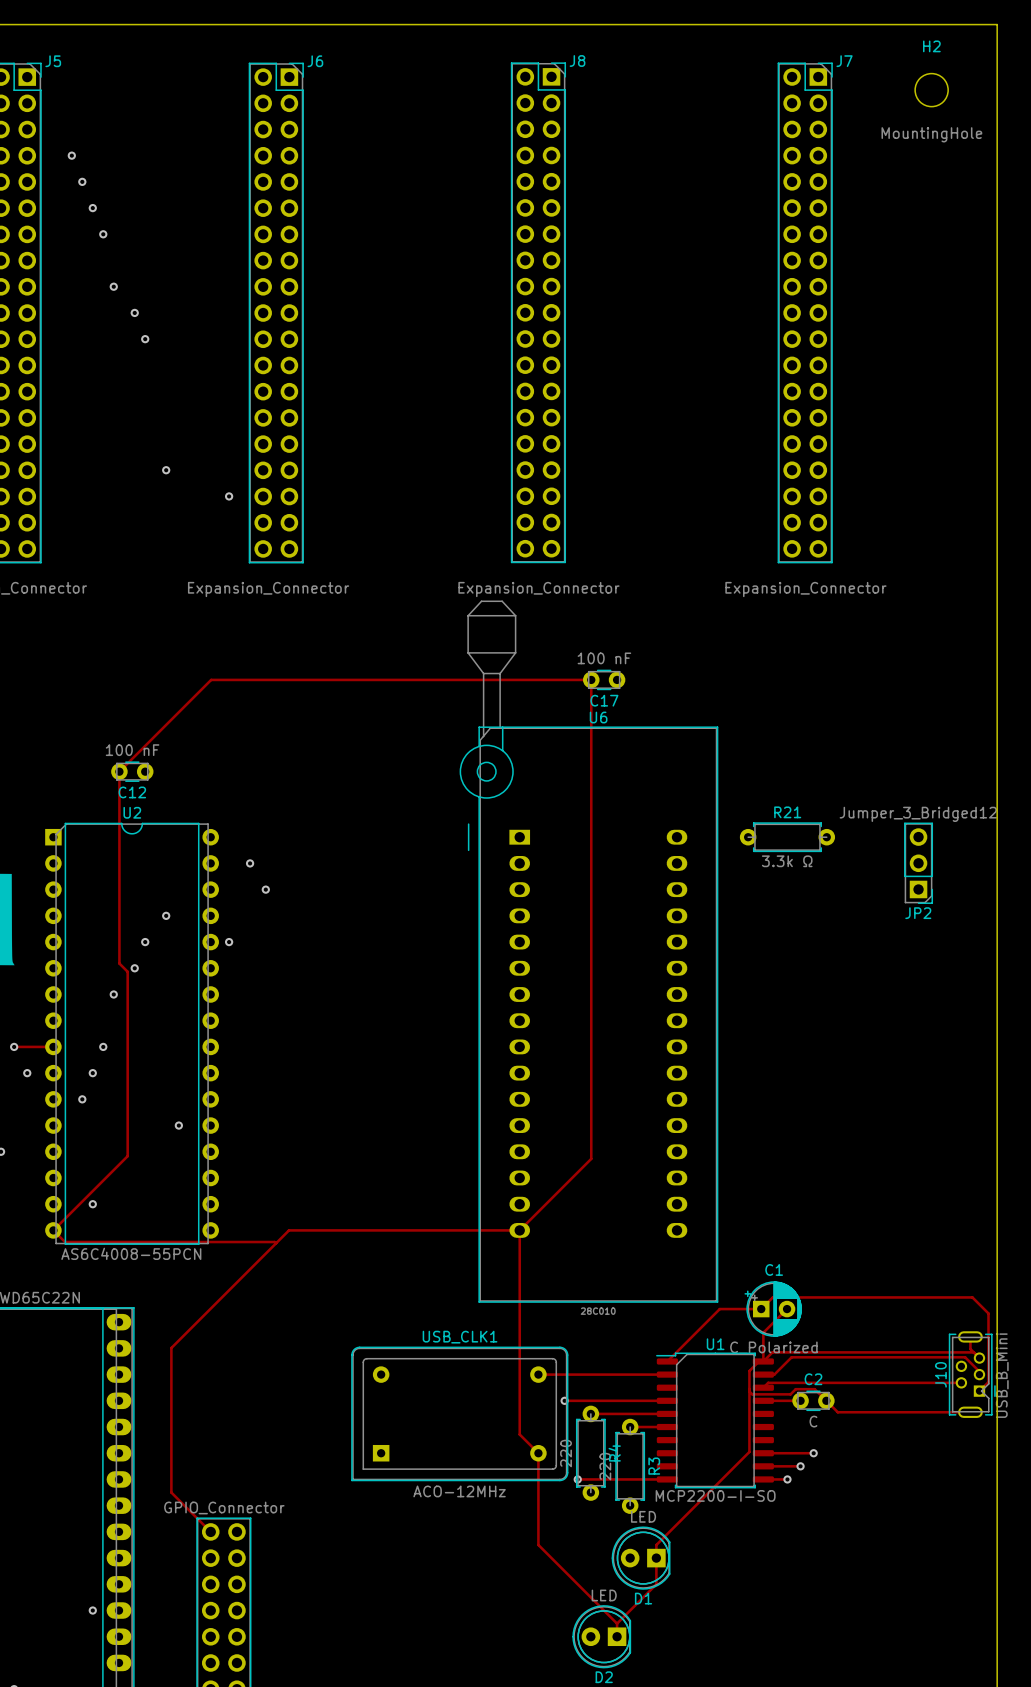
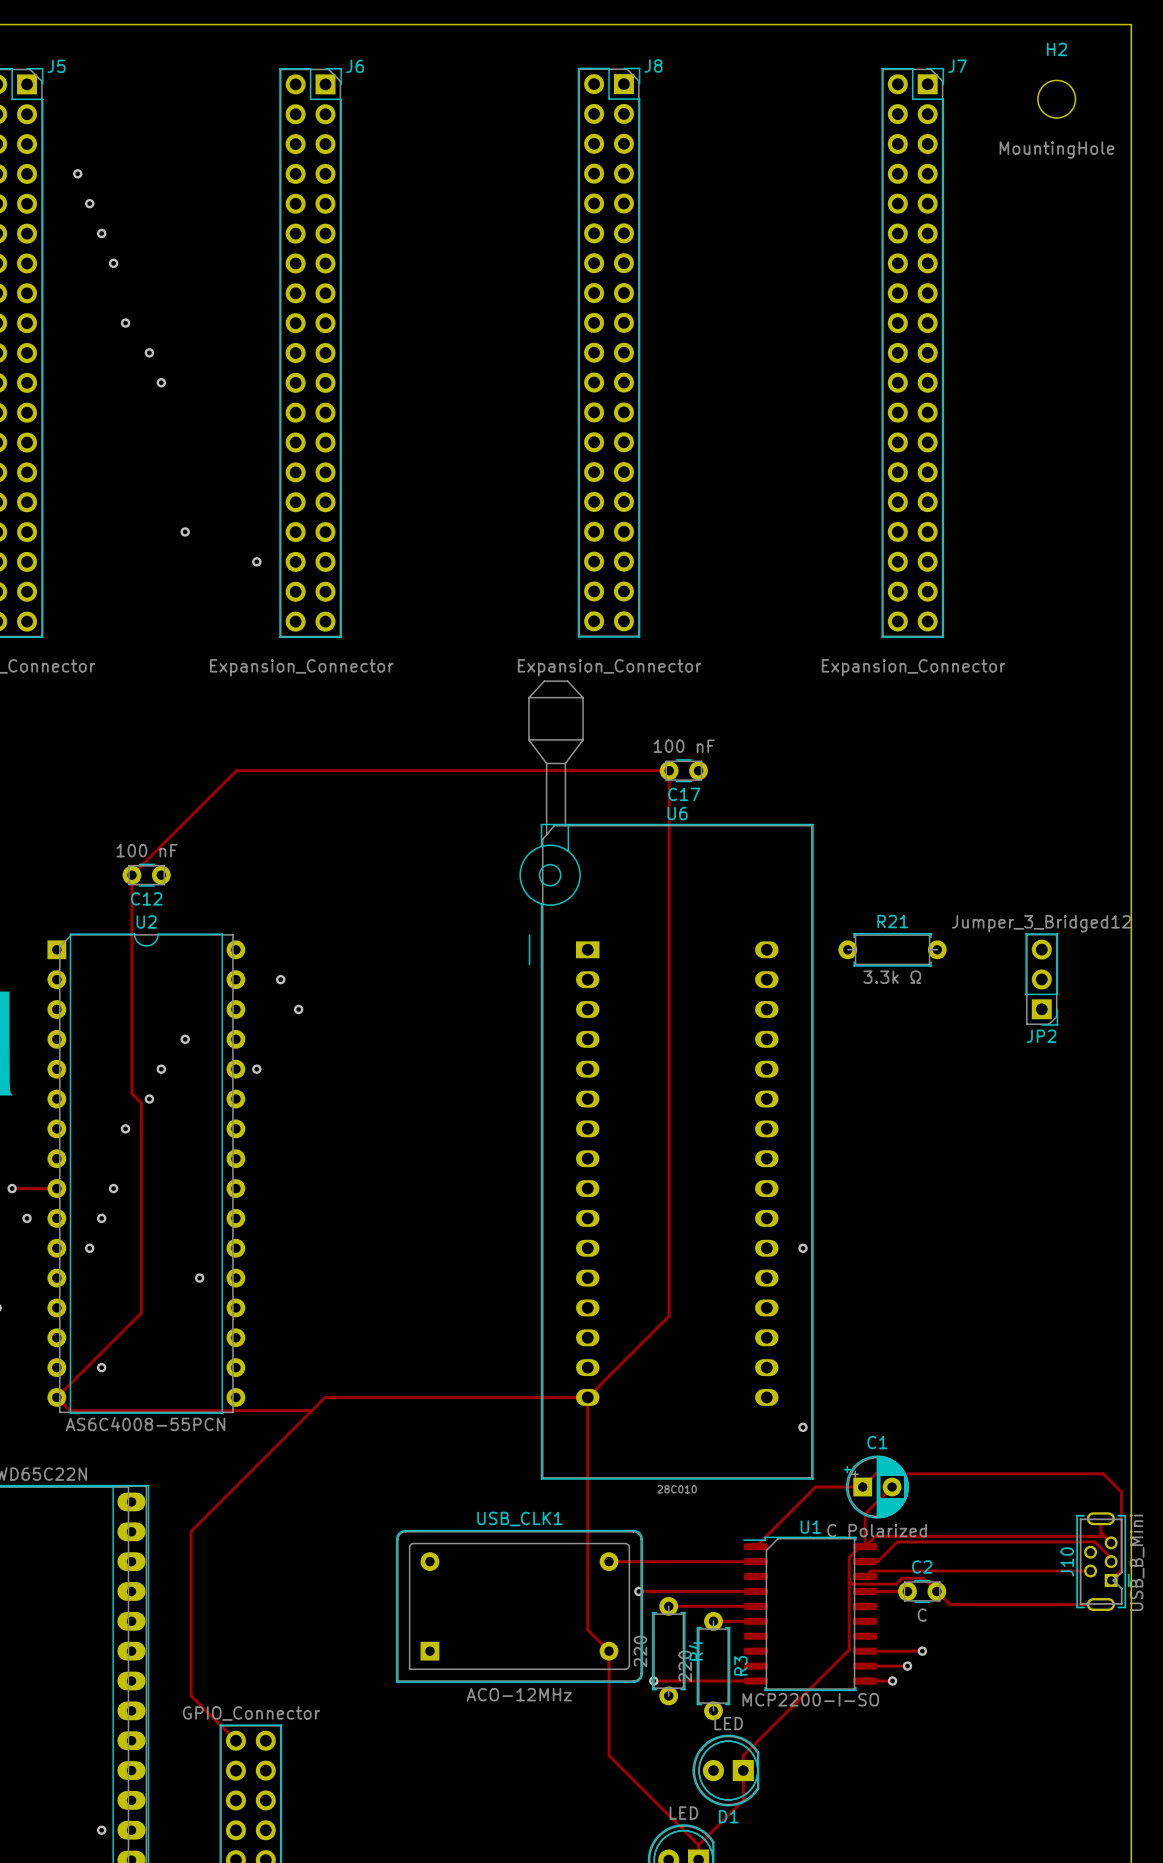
via: none -> (803, 1248)
via: none -> (803, 1427)

